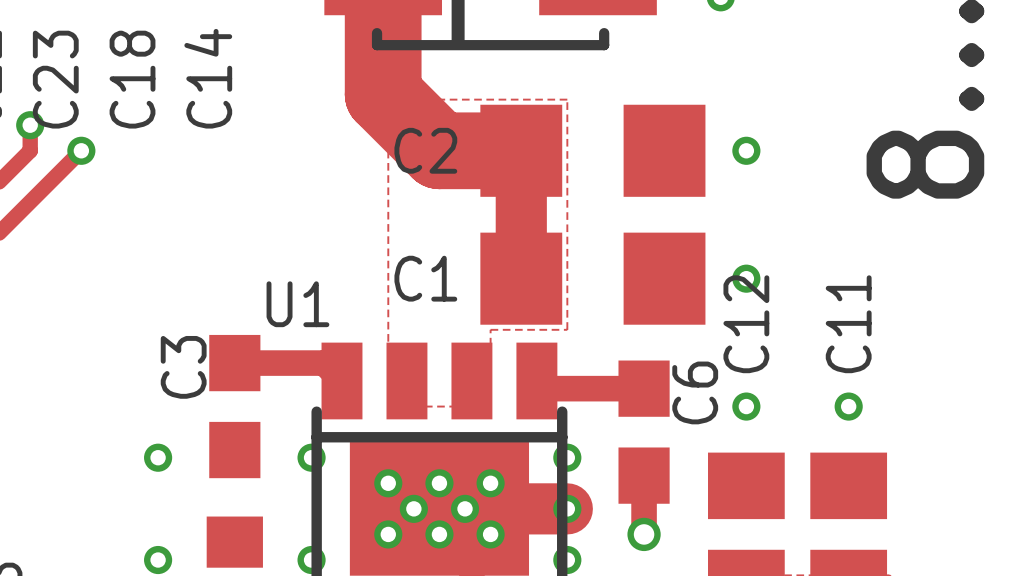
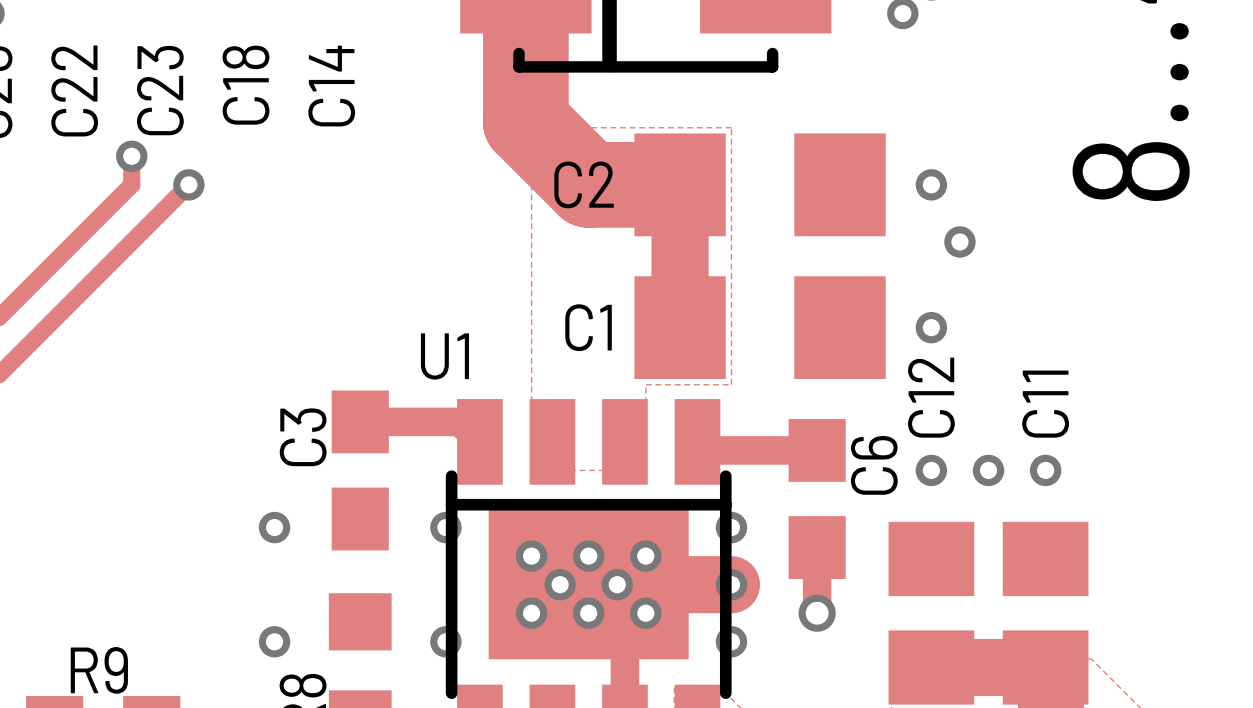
via: none -> (959, 241)
via: none -> (988, 470)

